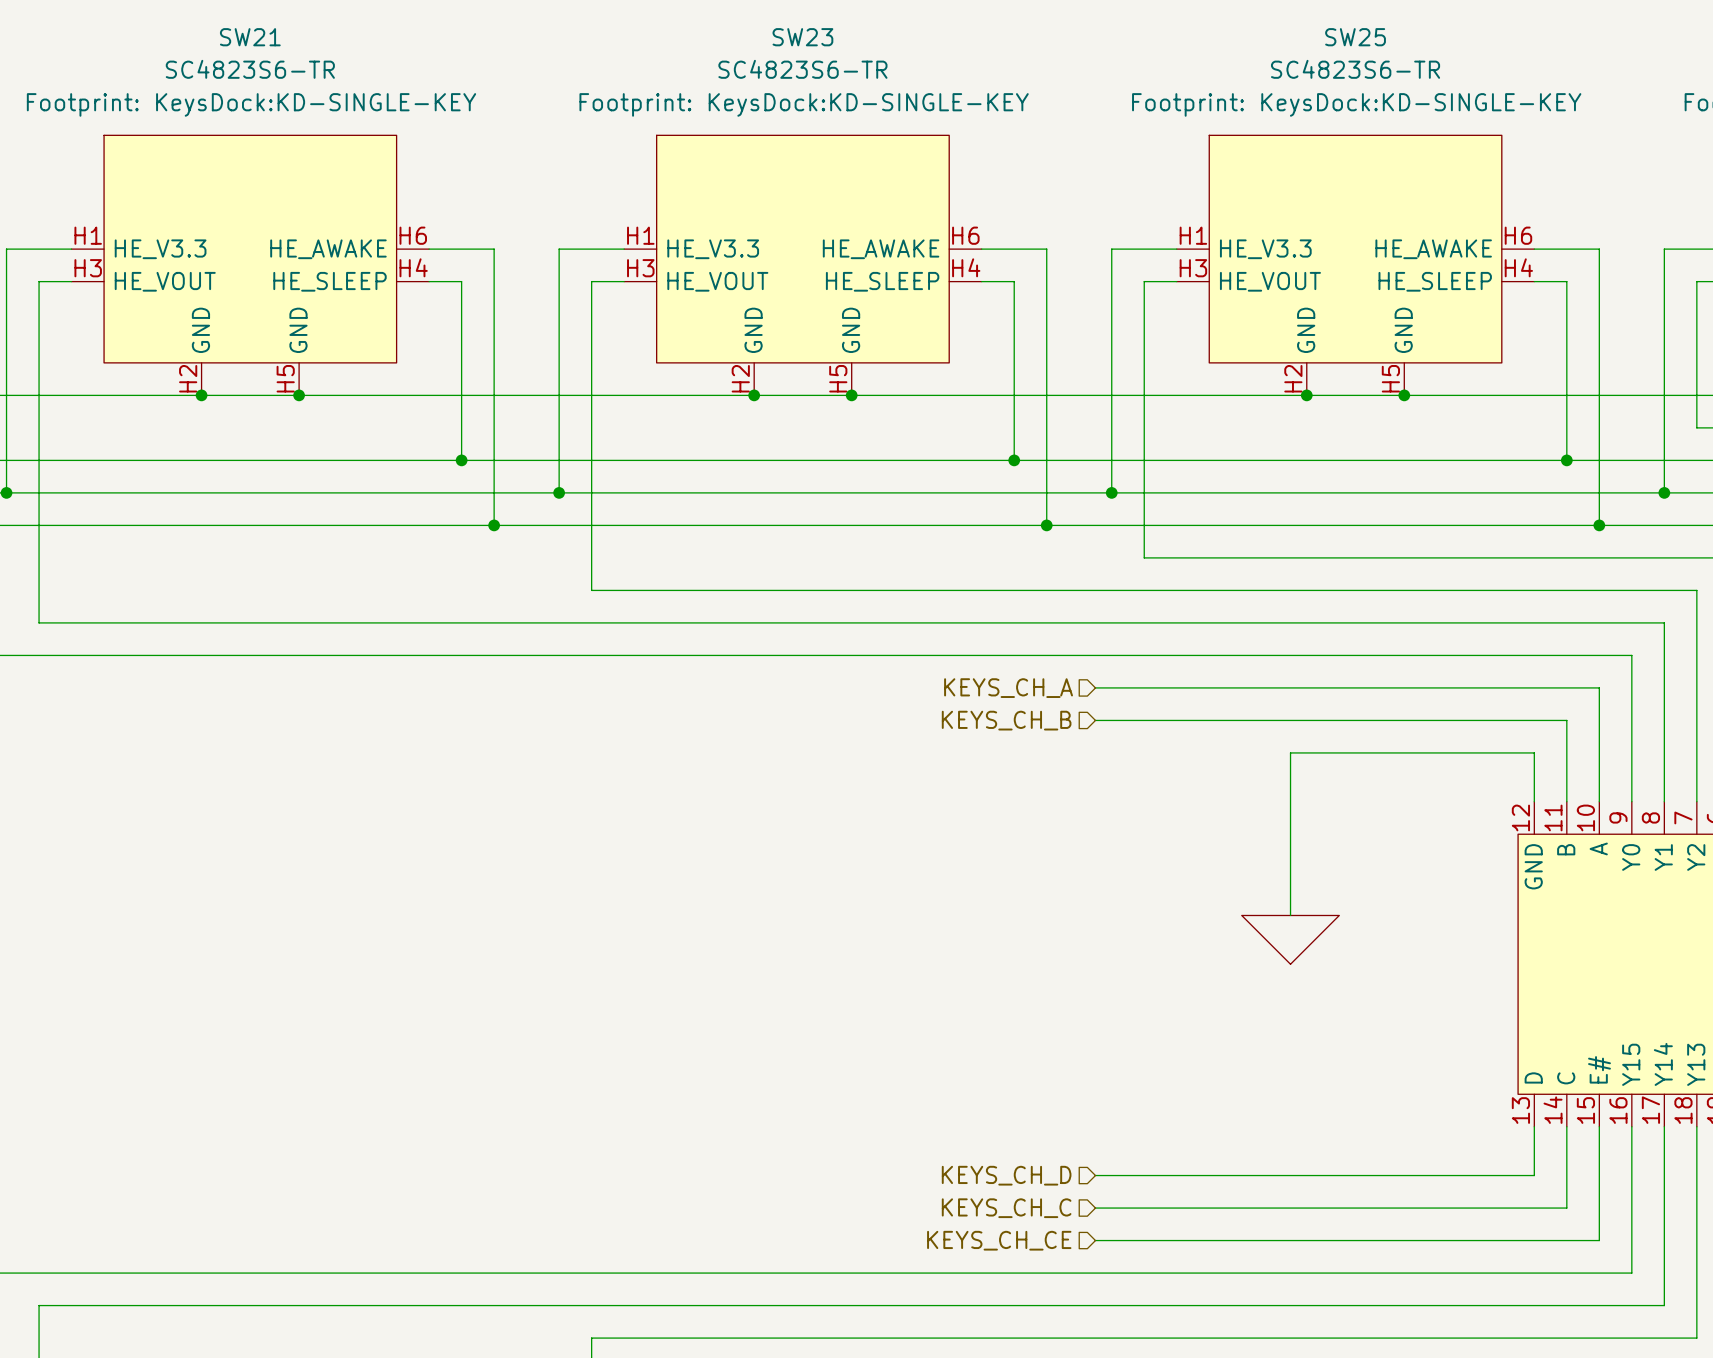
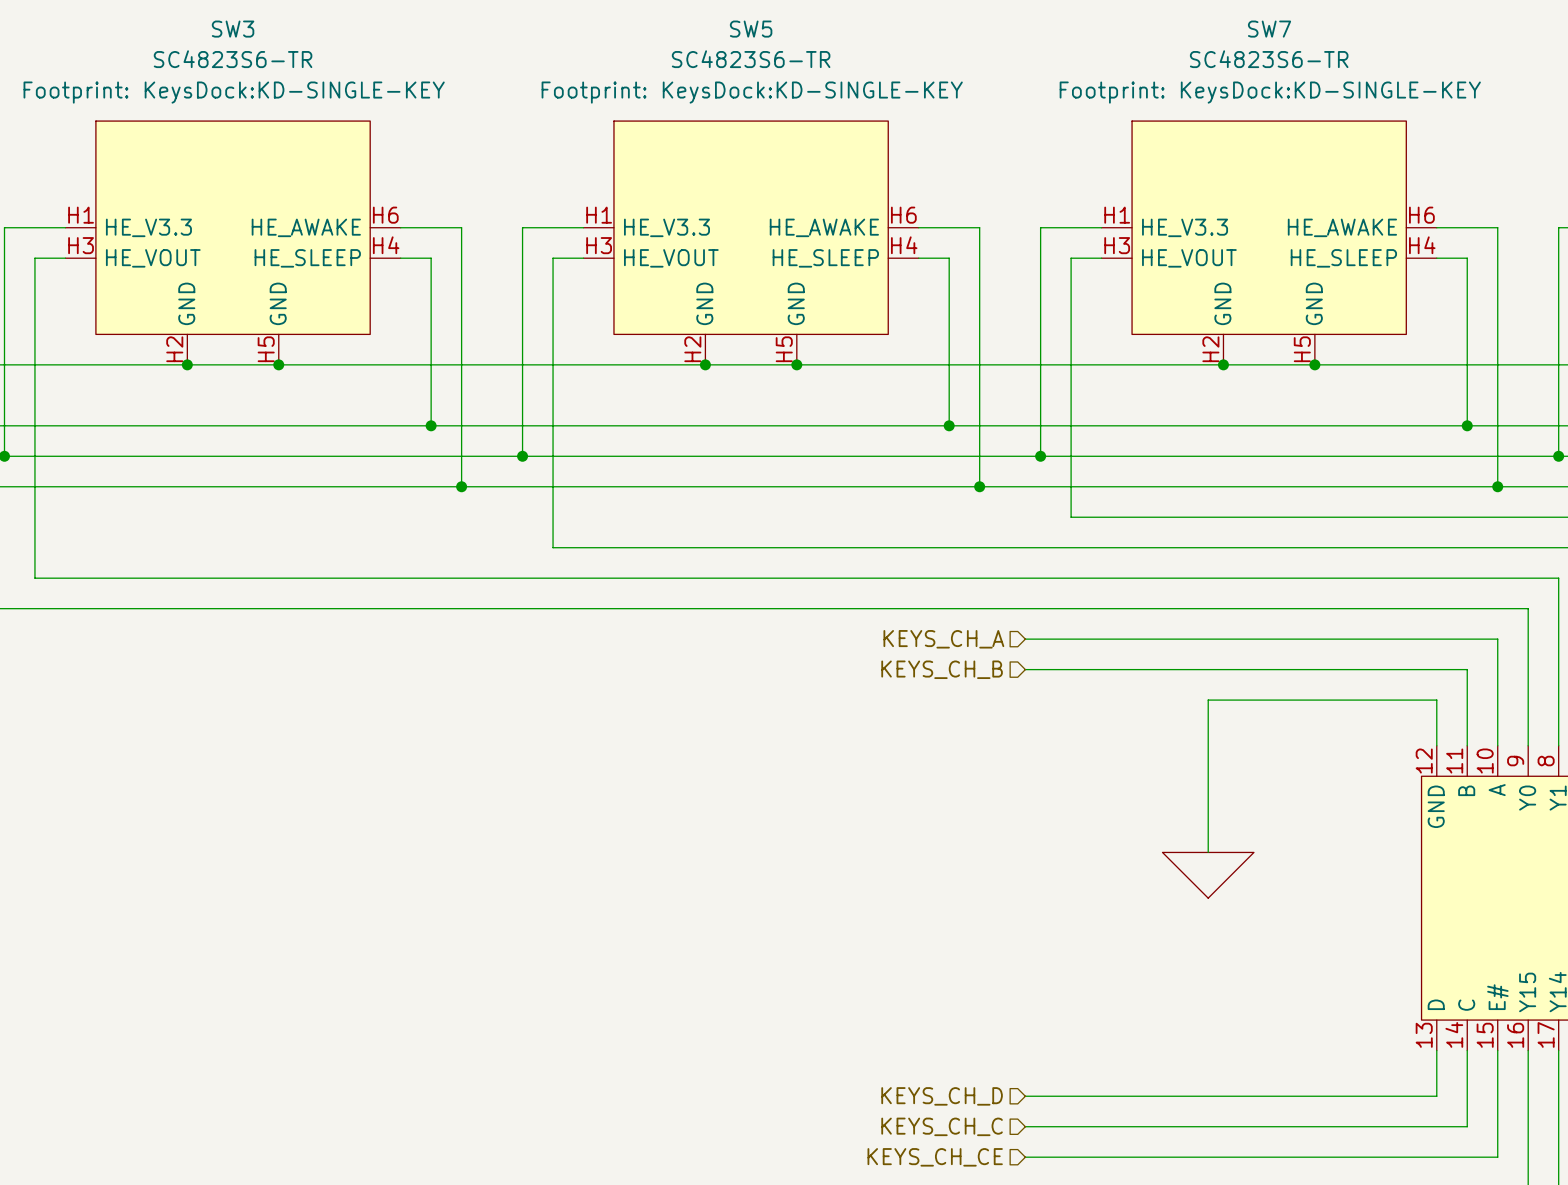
SW21 name: SW21 (250, 37) -> SW3 (233, 29)
SW23 name: SW23 (802, 37) -> SW5 (751, 29)
SW25 name: SW25 (1355, 37) -> SW7 (1269, 29)

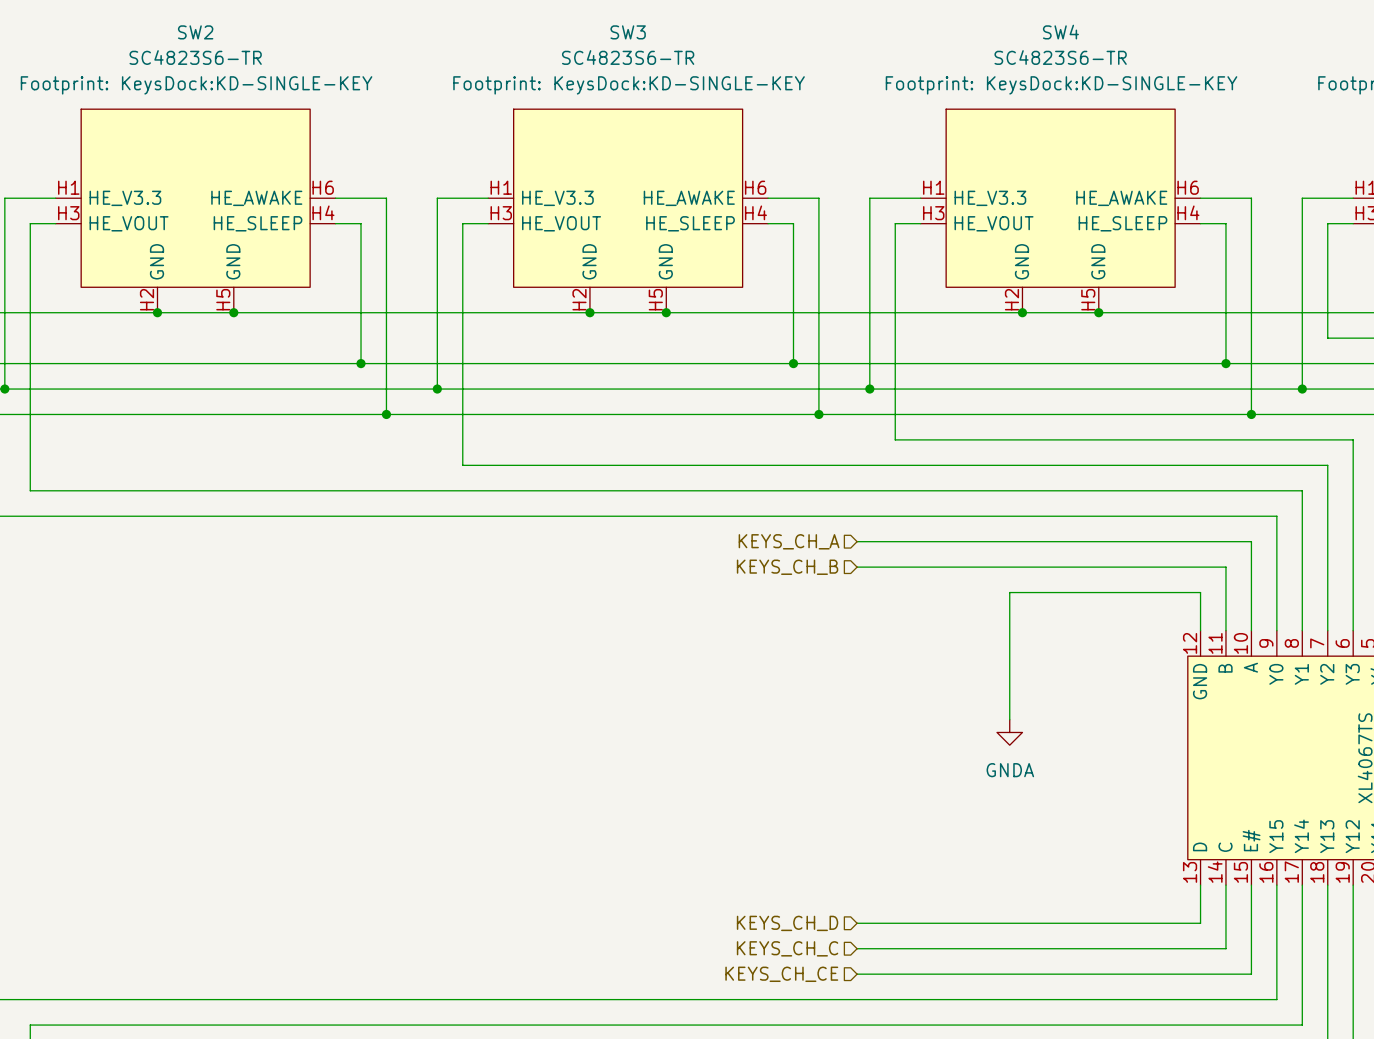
SW3 name: SW3 (233, 29) -> SW2 (195, 32)
SW5 name: SW5 (751, 29) -> SW3 (628, 32)
SW7 name: SW7 (1269, 29) -> SW4 (1060, 32)
power symbol shape: [1162, 852, 1254, 899] -> [997, 719, 1023, 746]
power symbol text: none -> GNDA (1010, 770)

